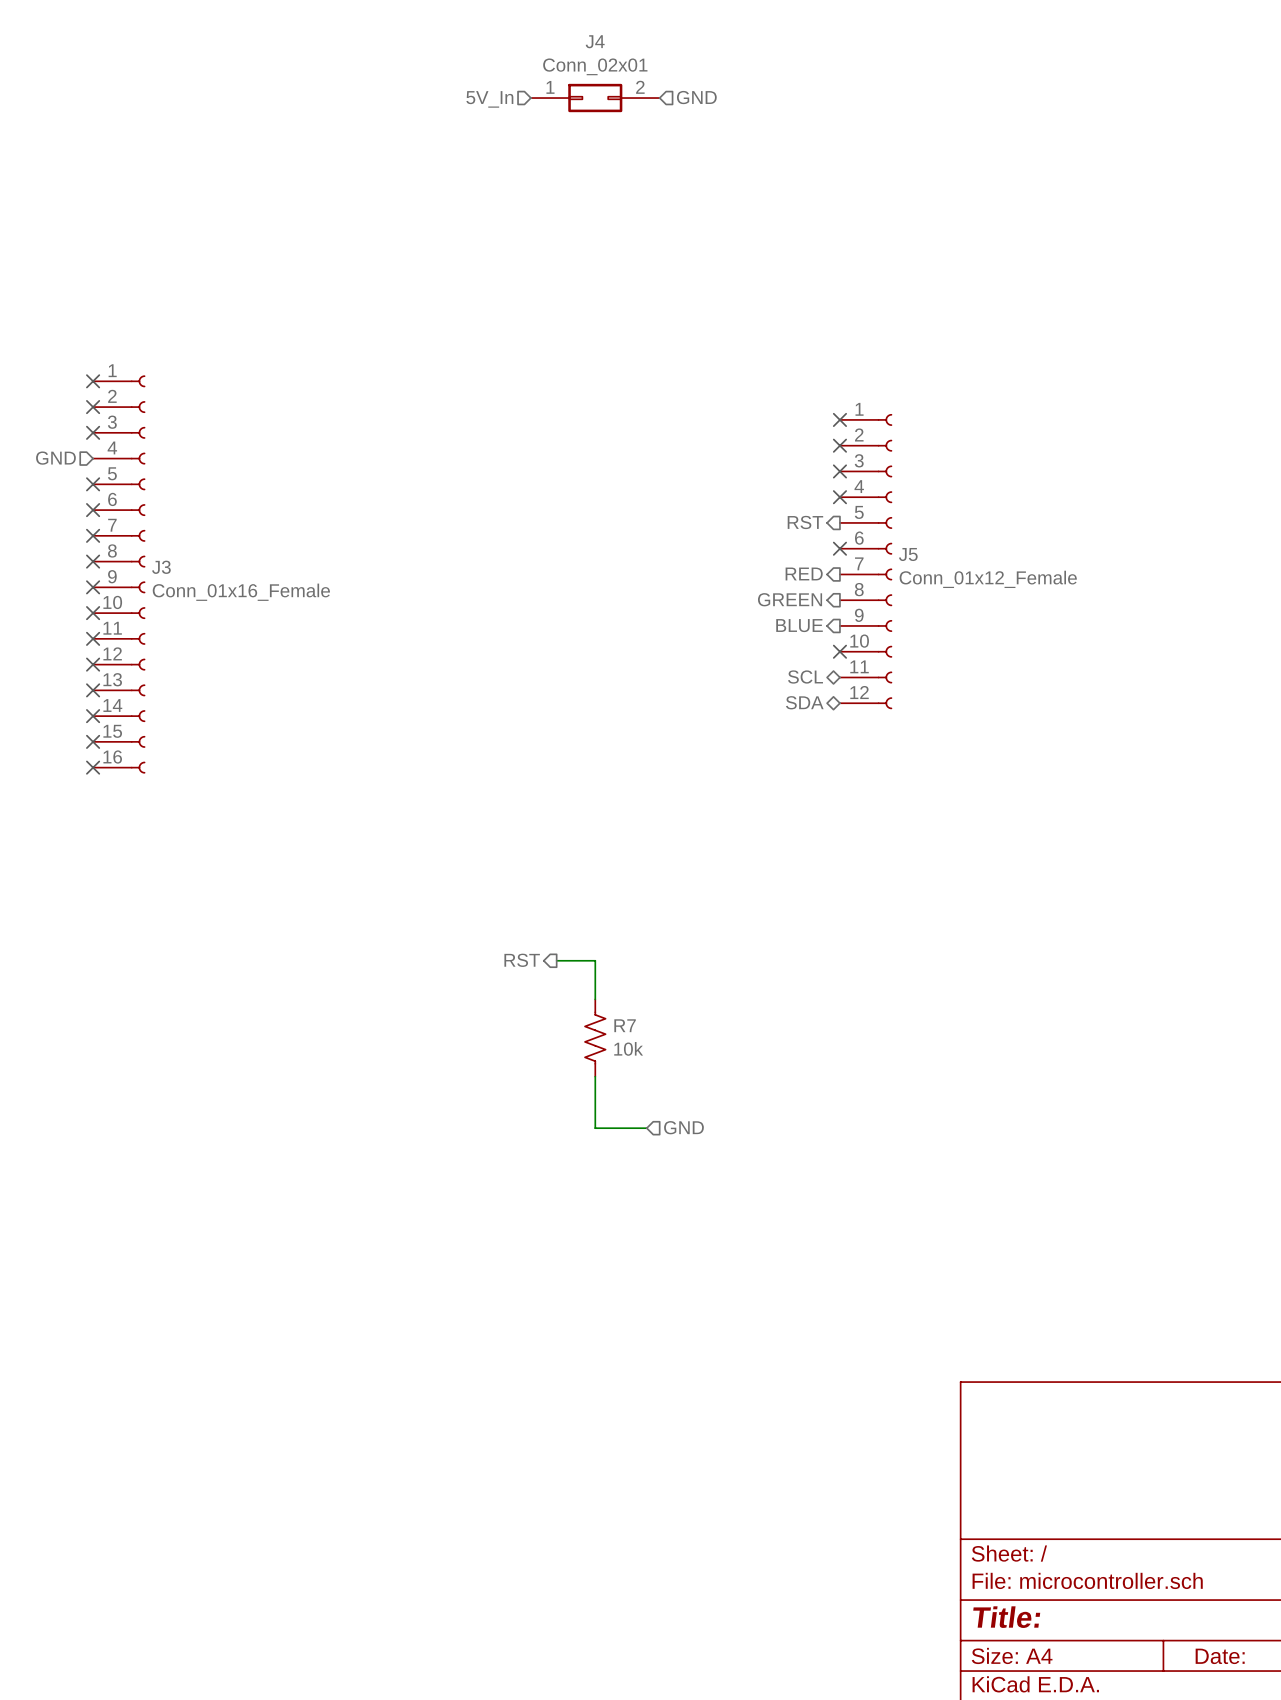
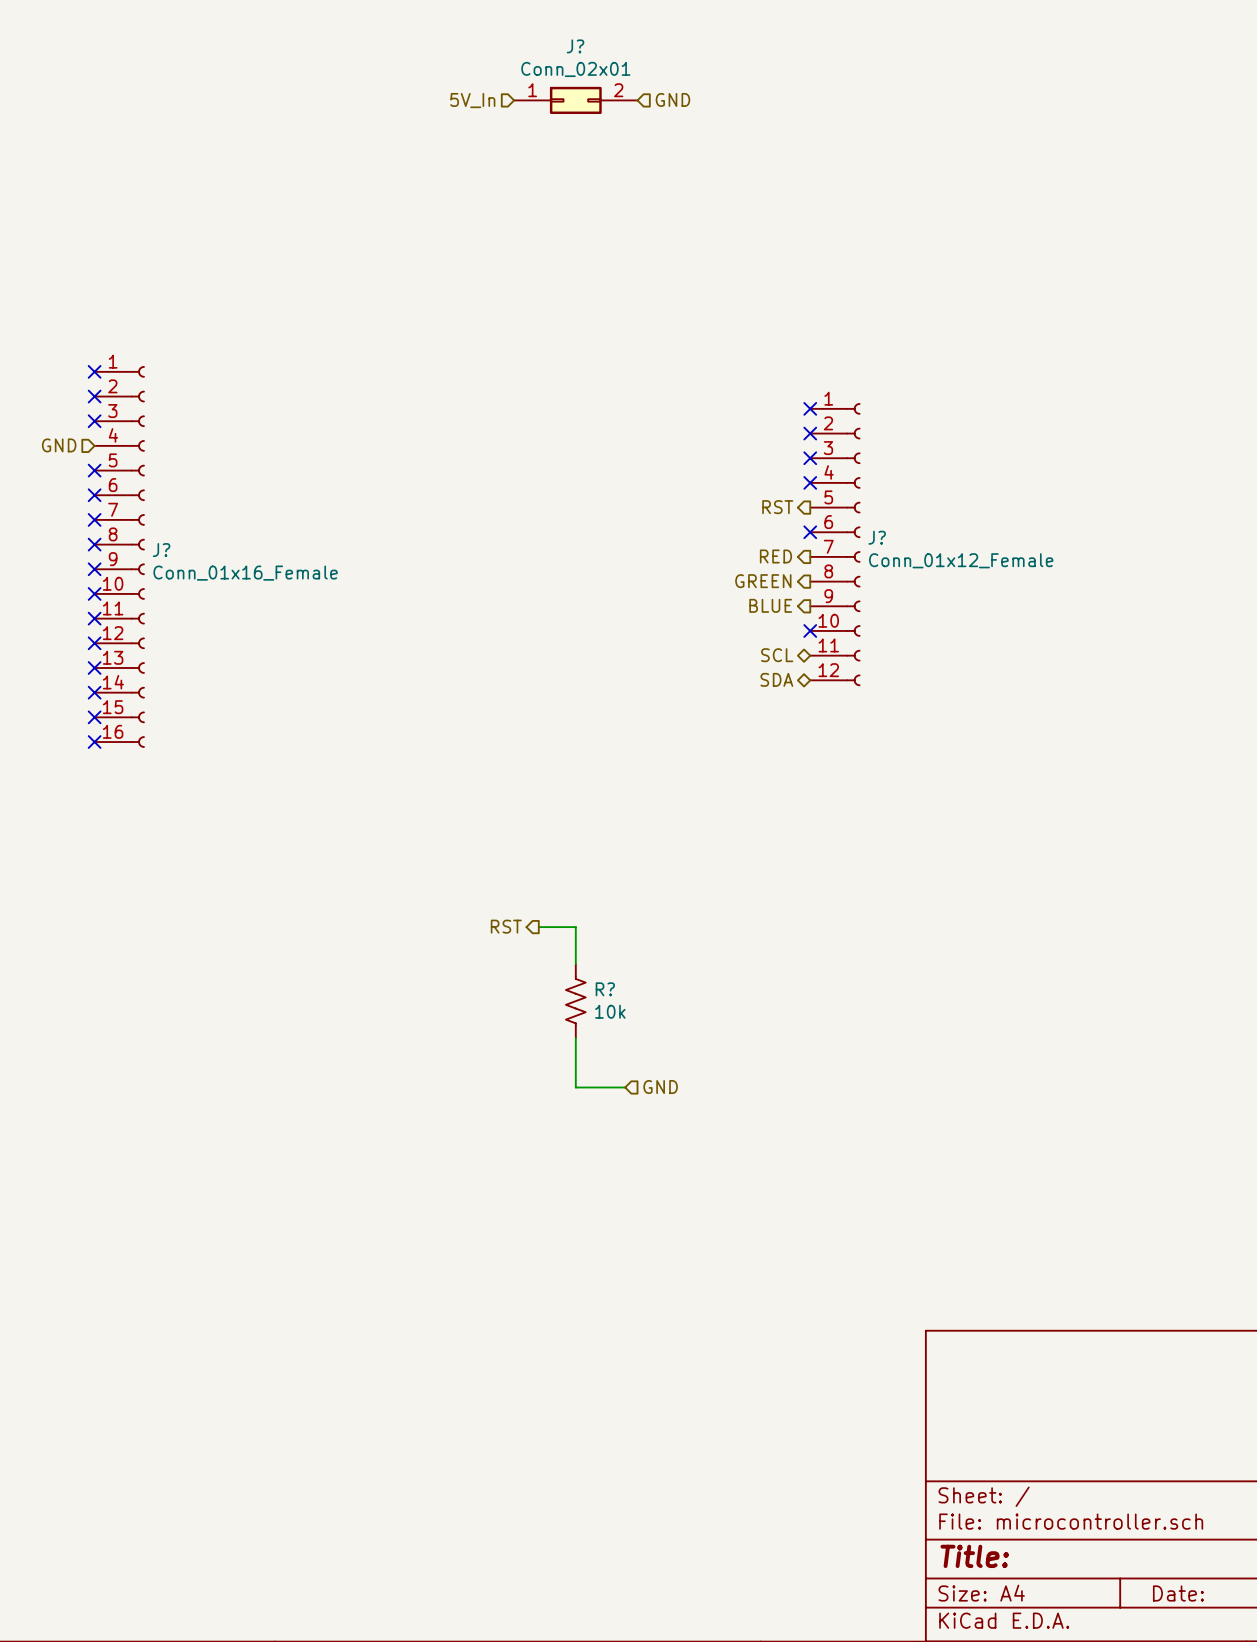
J4 name: J4 (595, 41) -> J? (575, 46)
J5 name: J5 (908, 554) -> J? (877, 537)
J3 name: J3 (161, 567) -> J? (161, 550)
R7 name: R7 (625, 1025) -> R? (605, 989)

